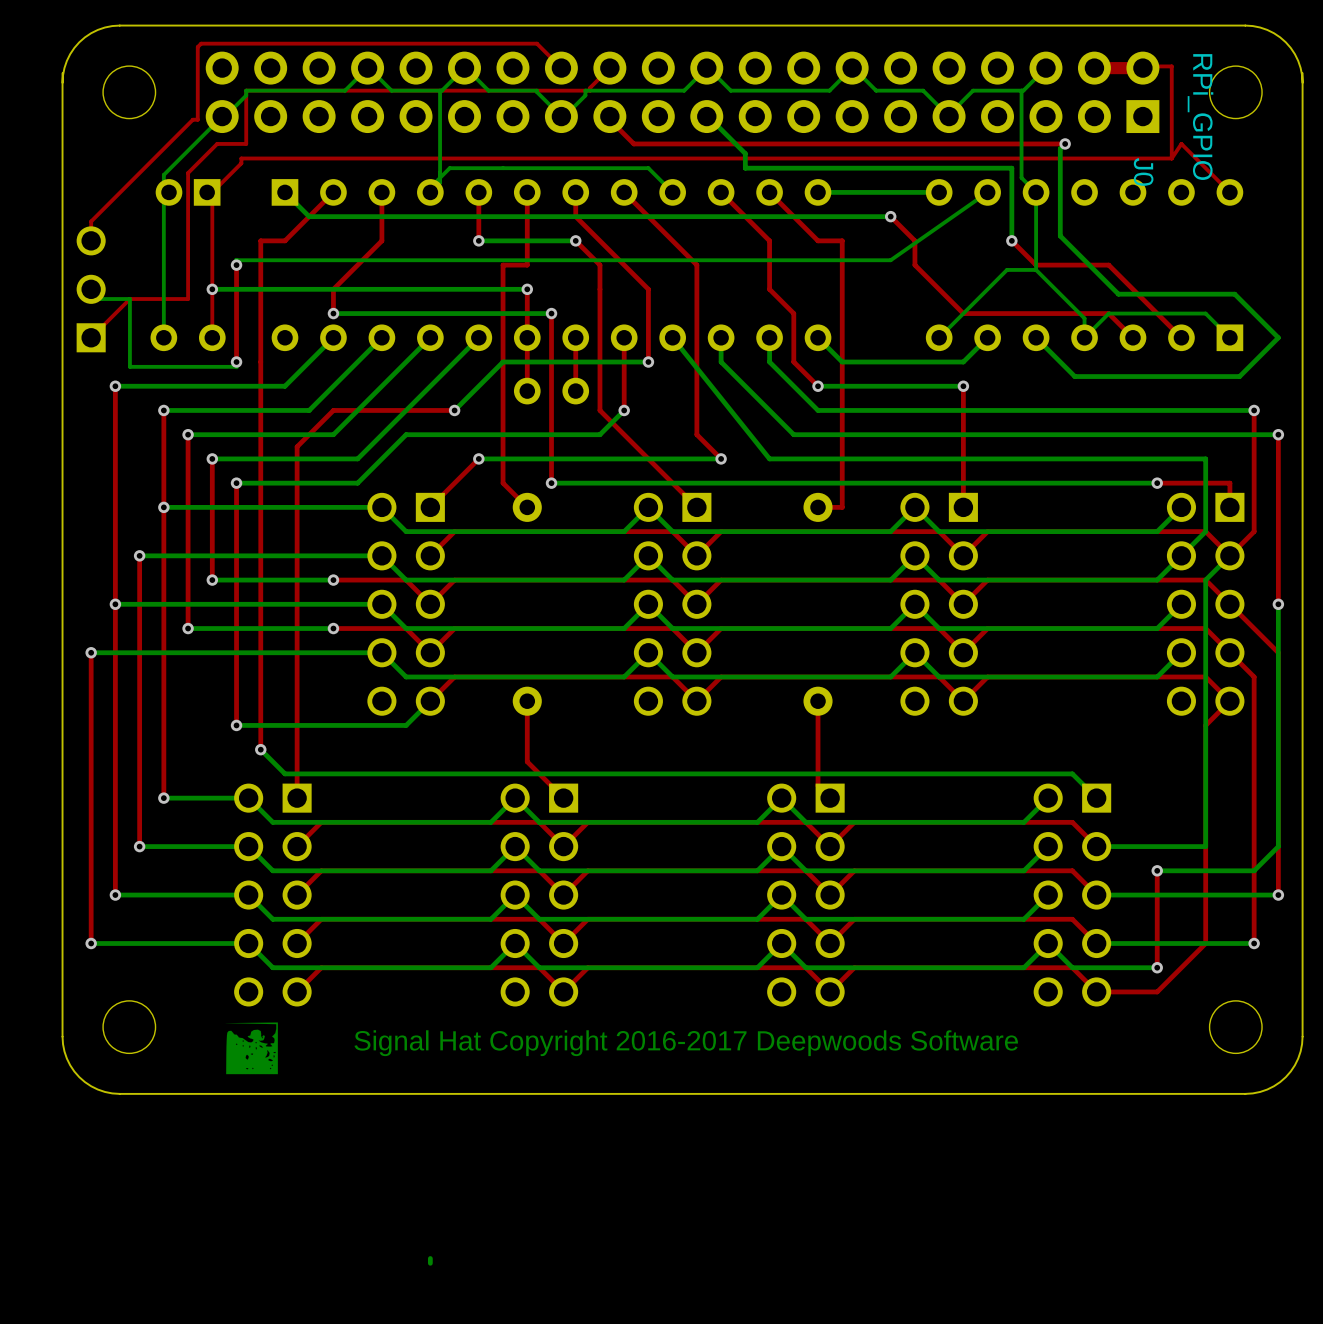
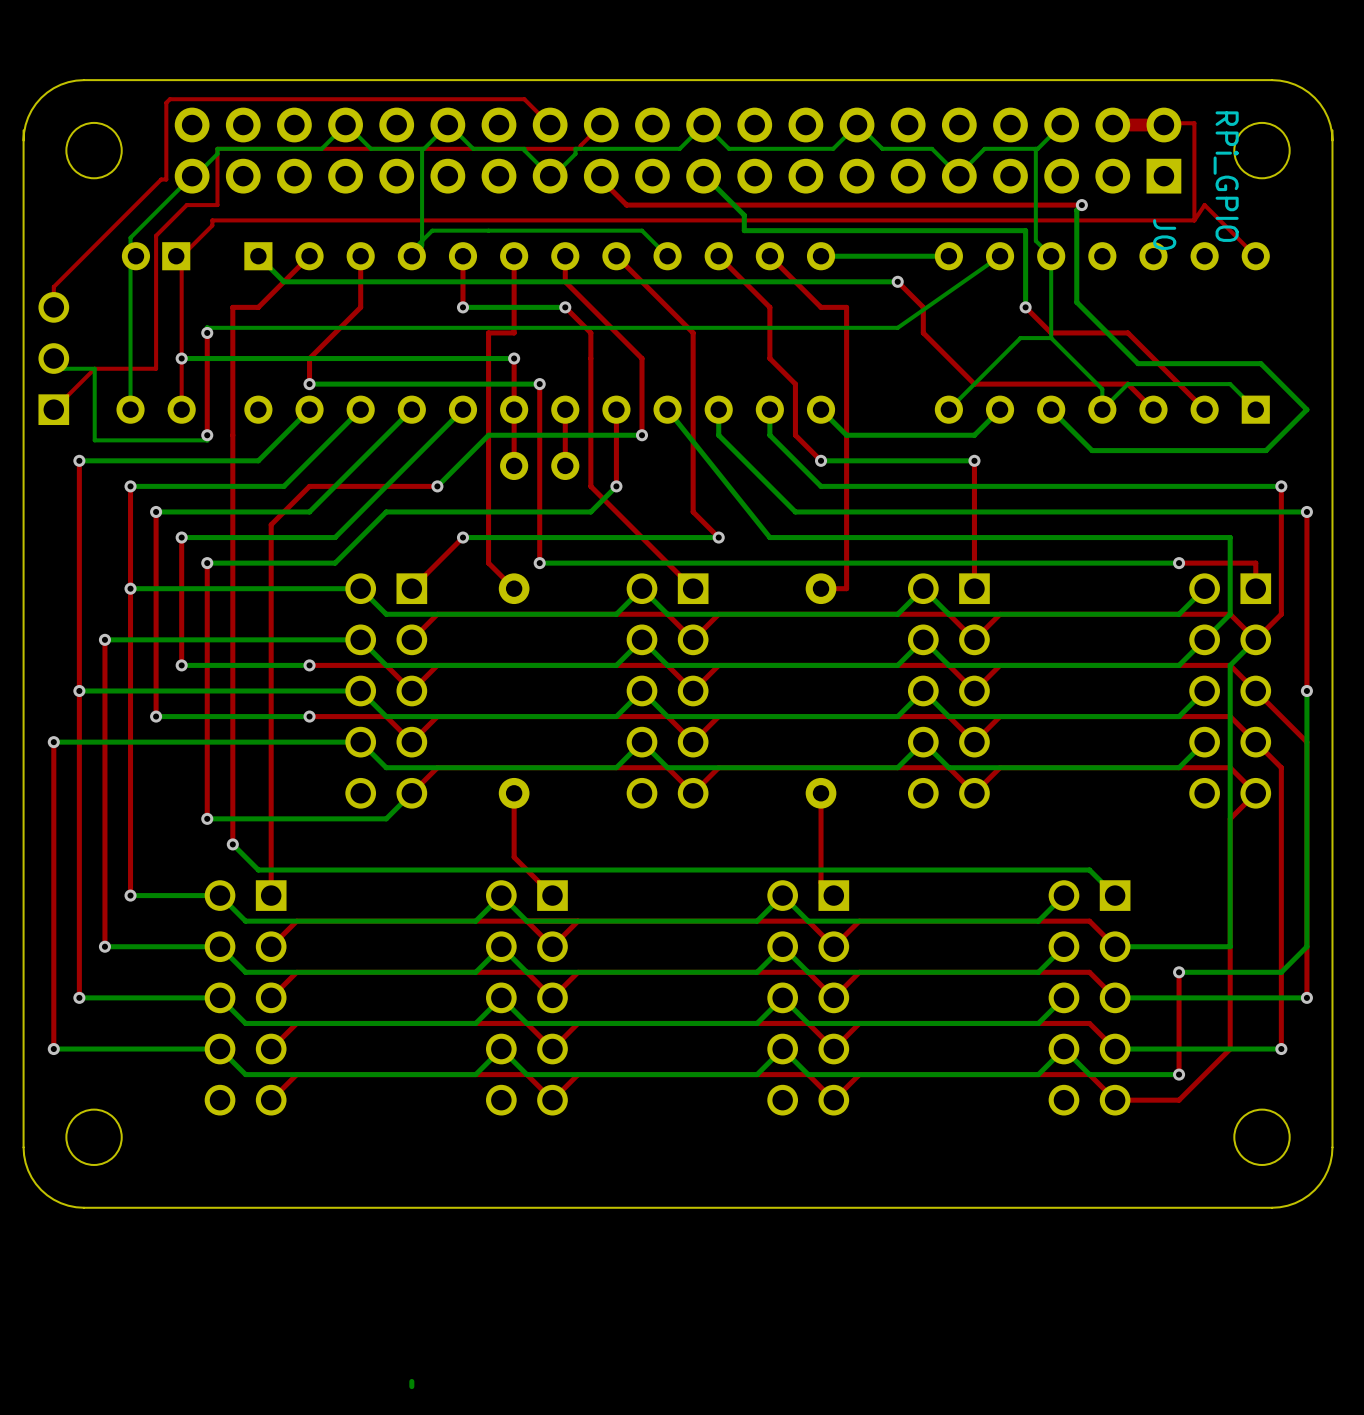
drawing: [225, 1022, 278, 1075] -> none
text: Signal Hat Copyright 2016-2017 Deepwoods Software (686, 1043) -> none

